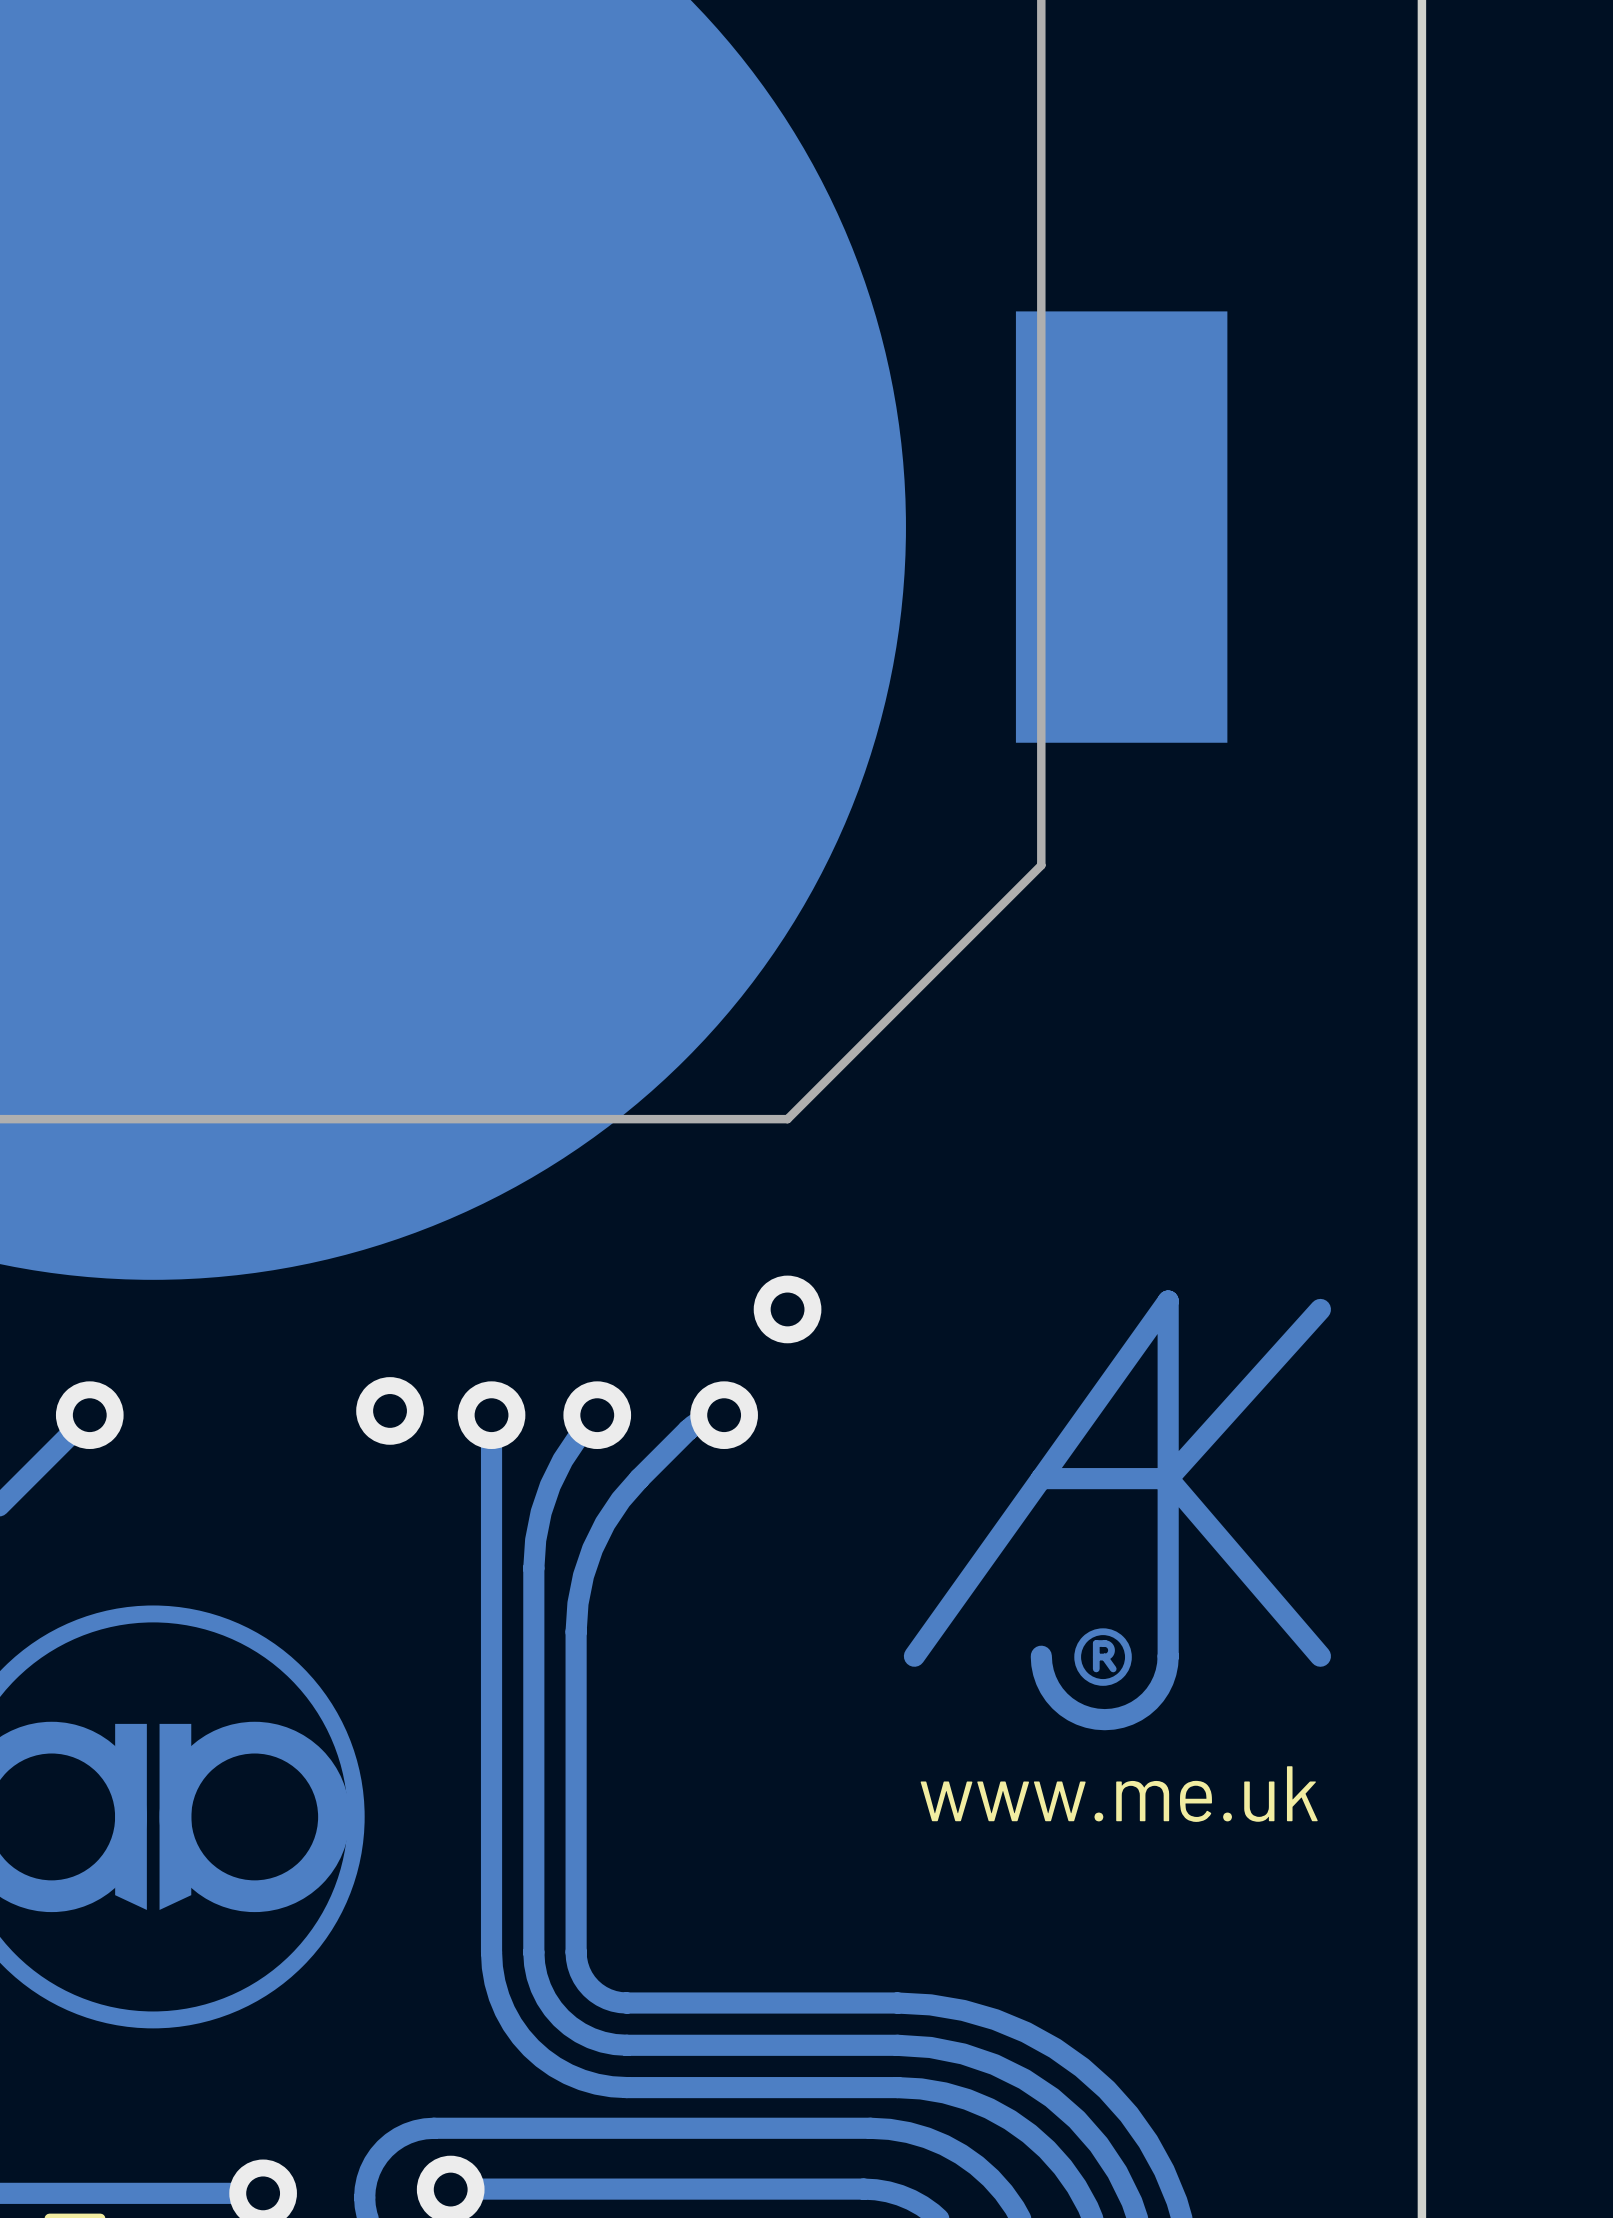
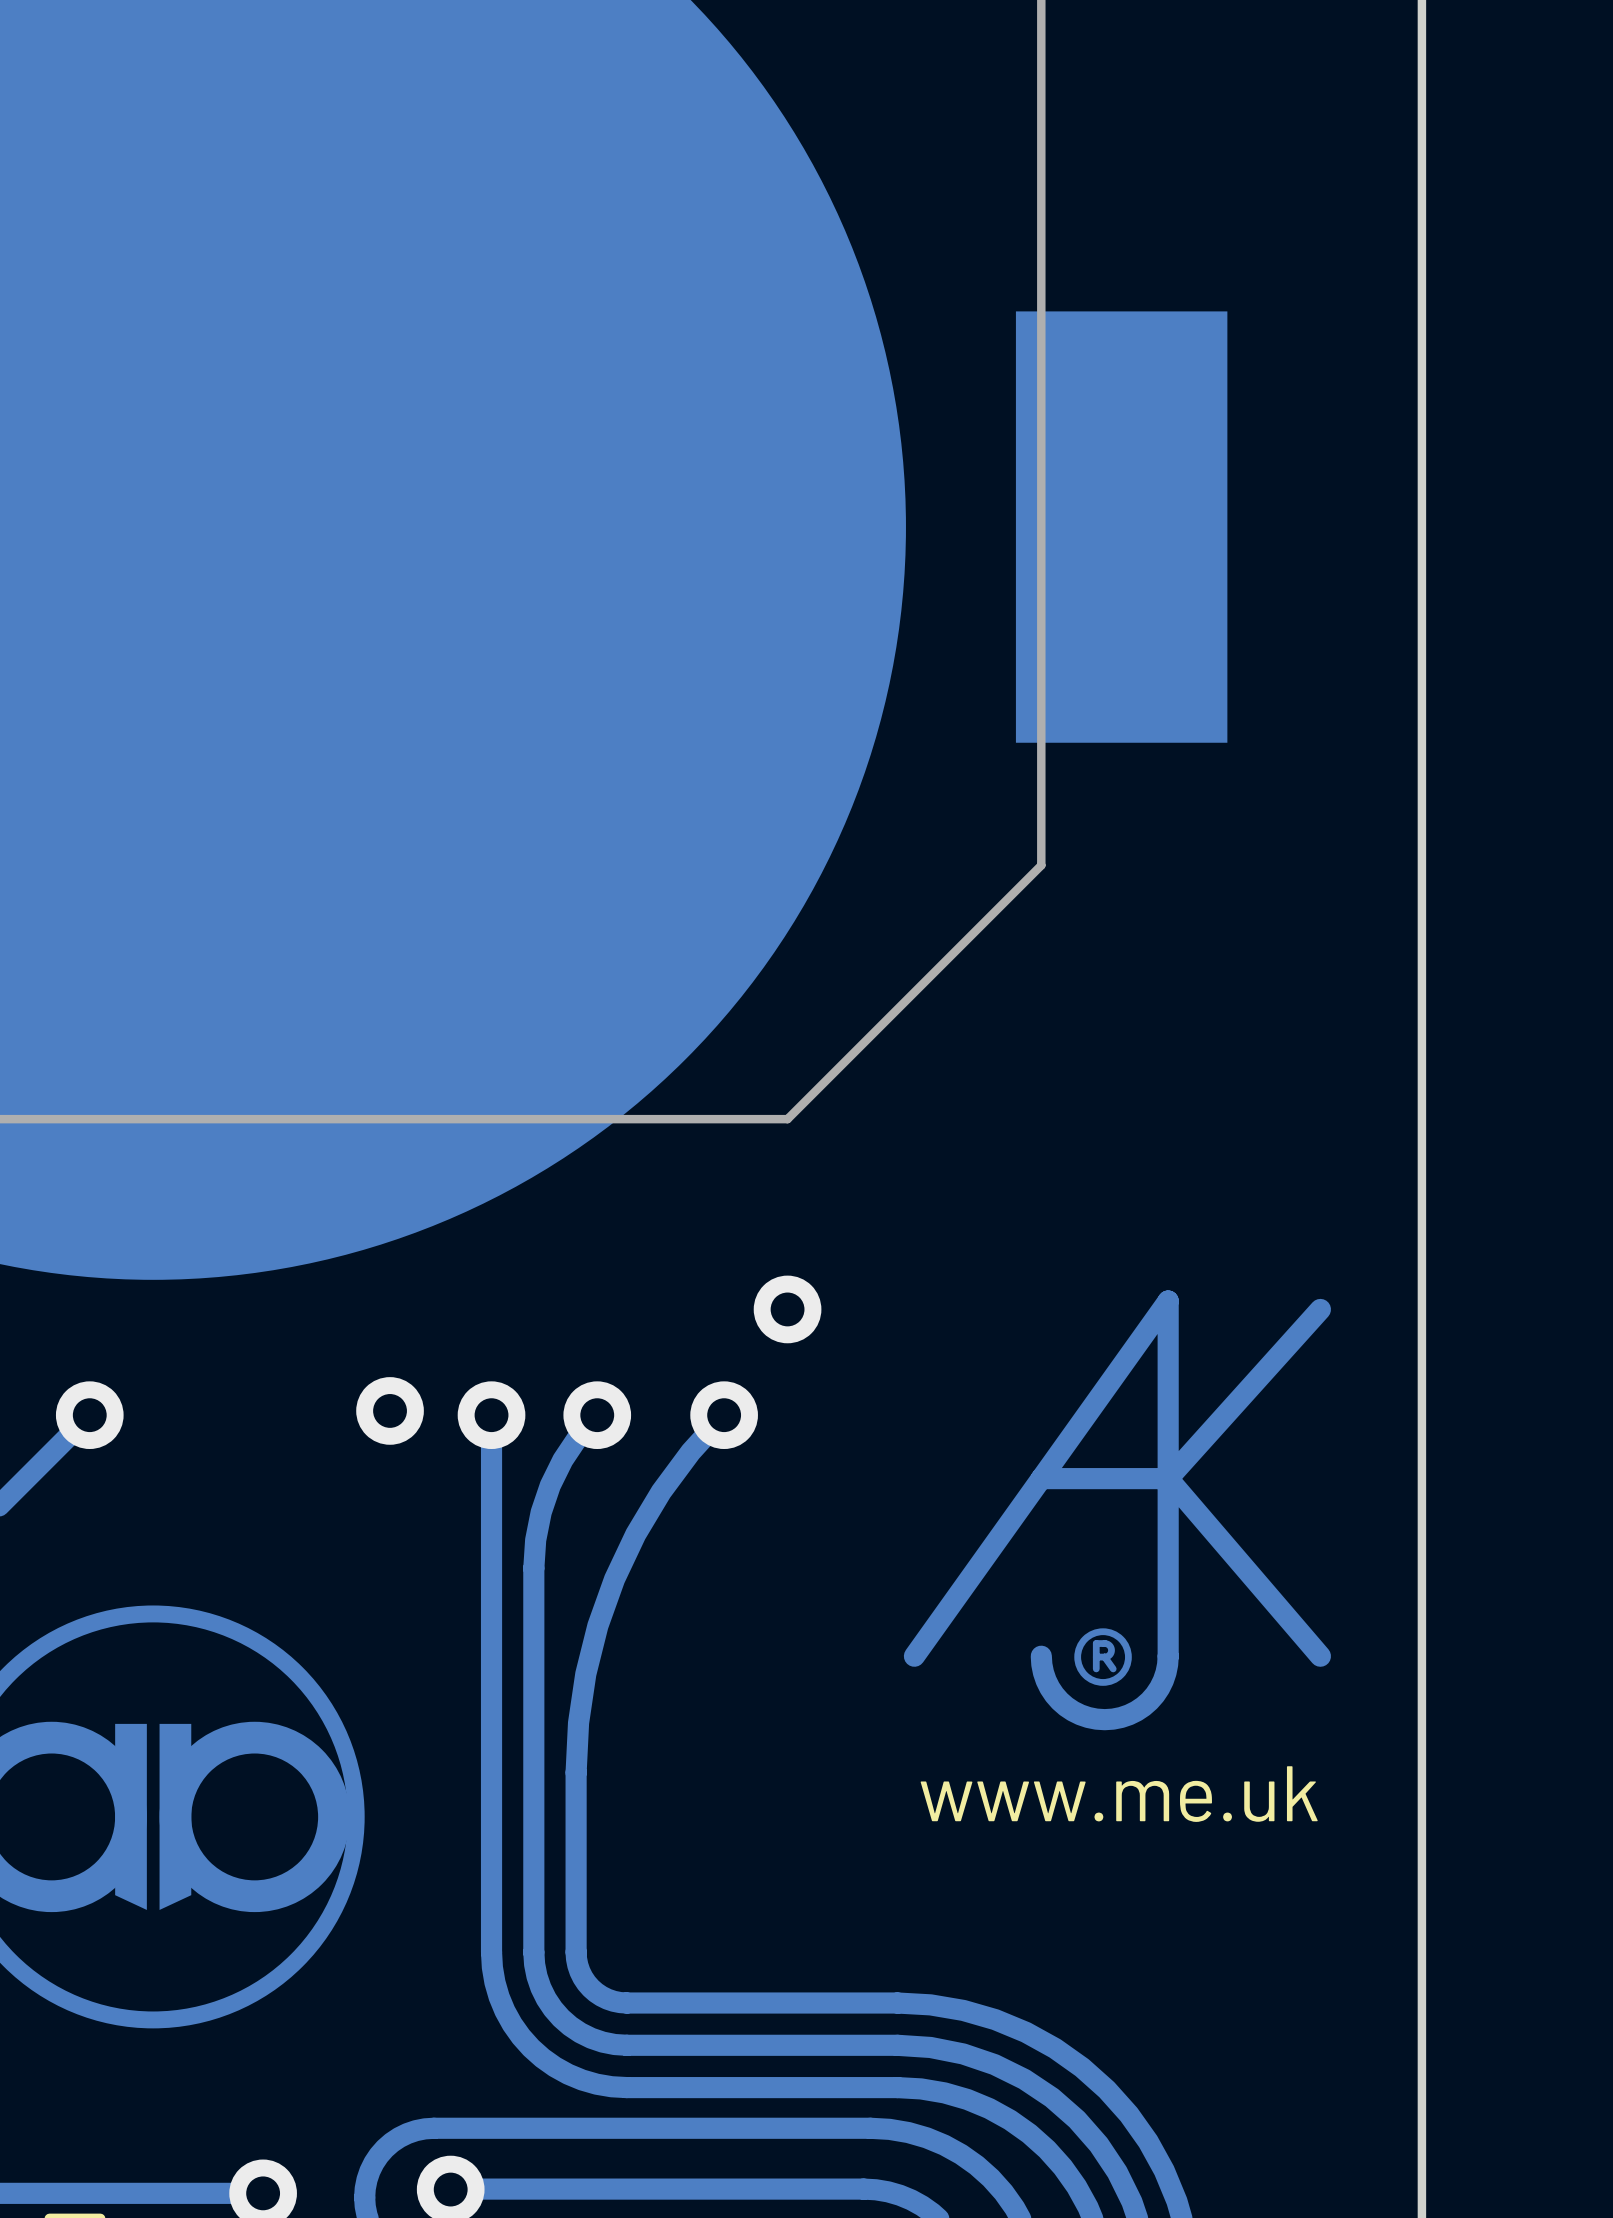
track: (724, 1415) (710, 1416) (693, 1425) (639, 1478) (620, 1499) (605, 1523) (592, 1548) (583, 1575) (577, 1603) (576, 1631) (576, 1772) -> (724, 1415) (690, 1451) (661, 1491) (635, 1534) (614, 1579) (597, 1625) (585, 1673) (578, 1722) (576, 1772)

